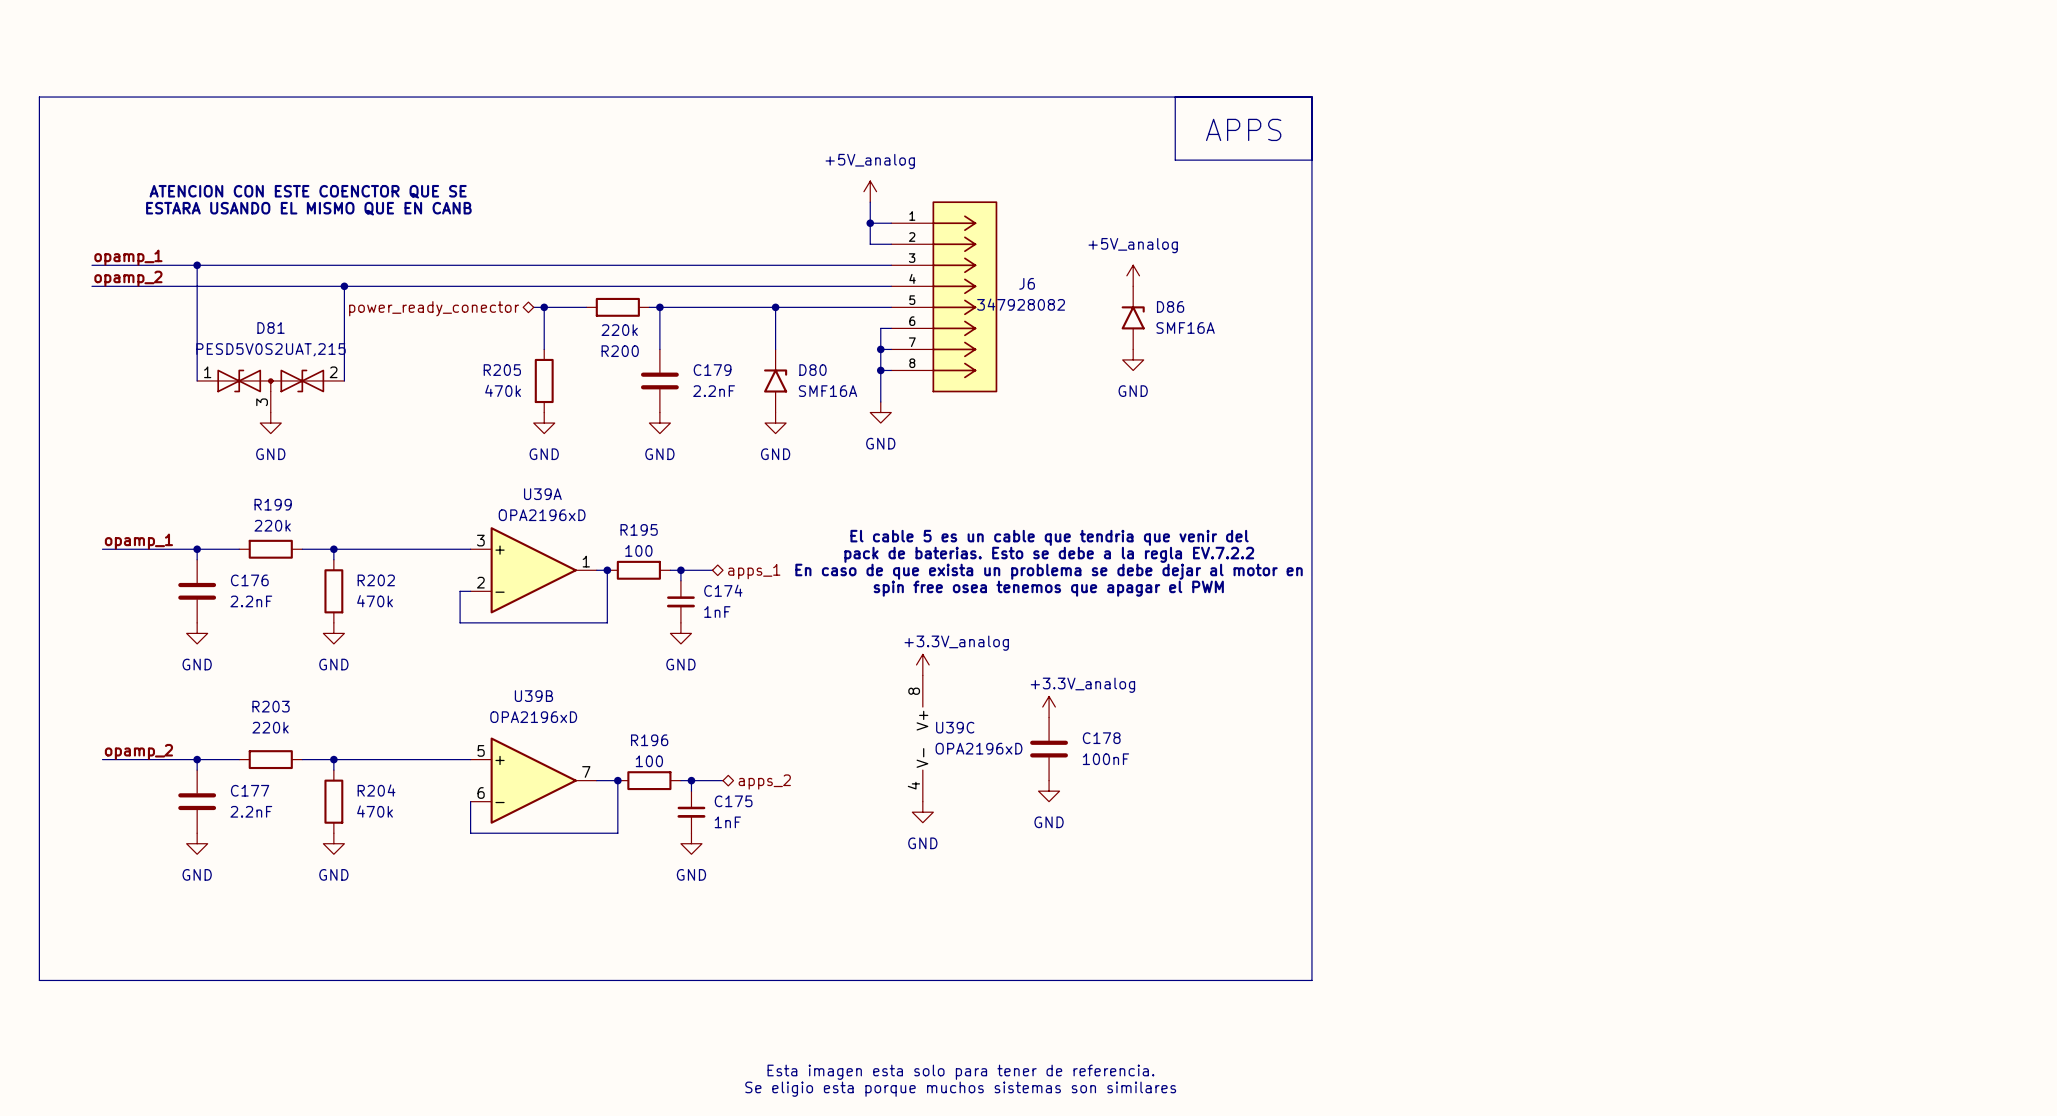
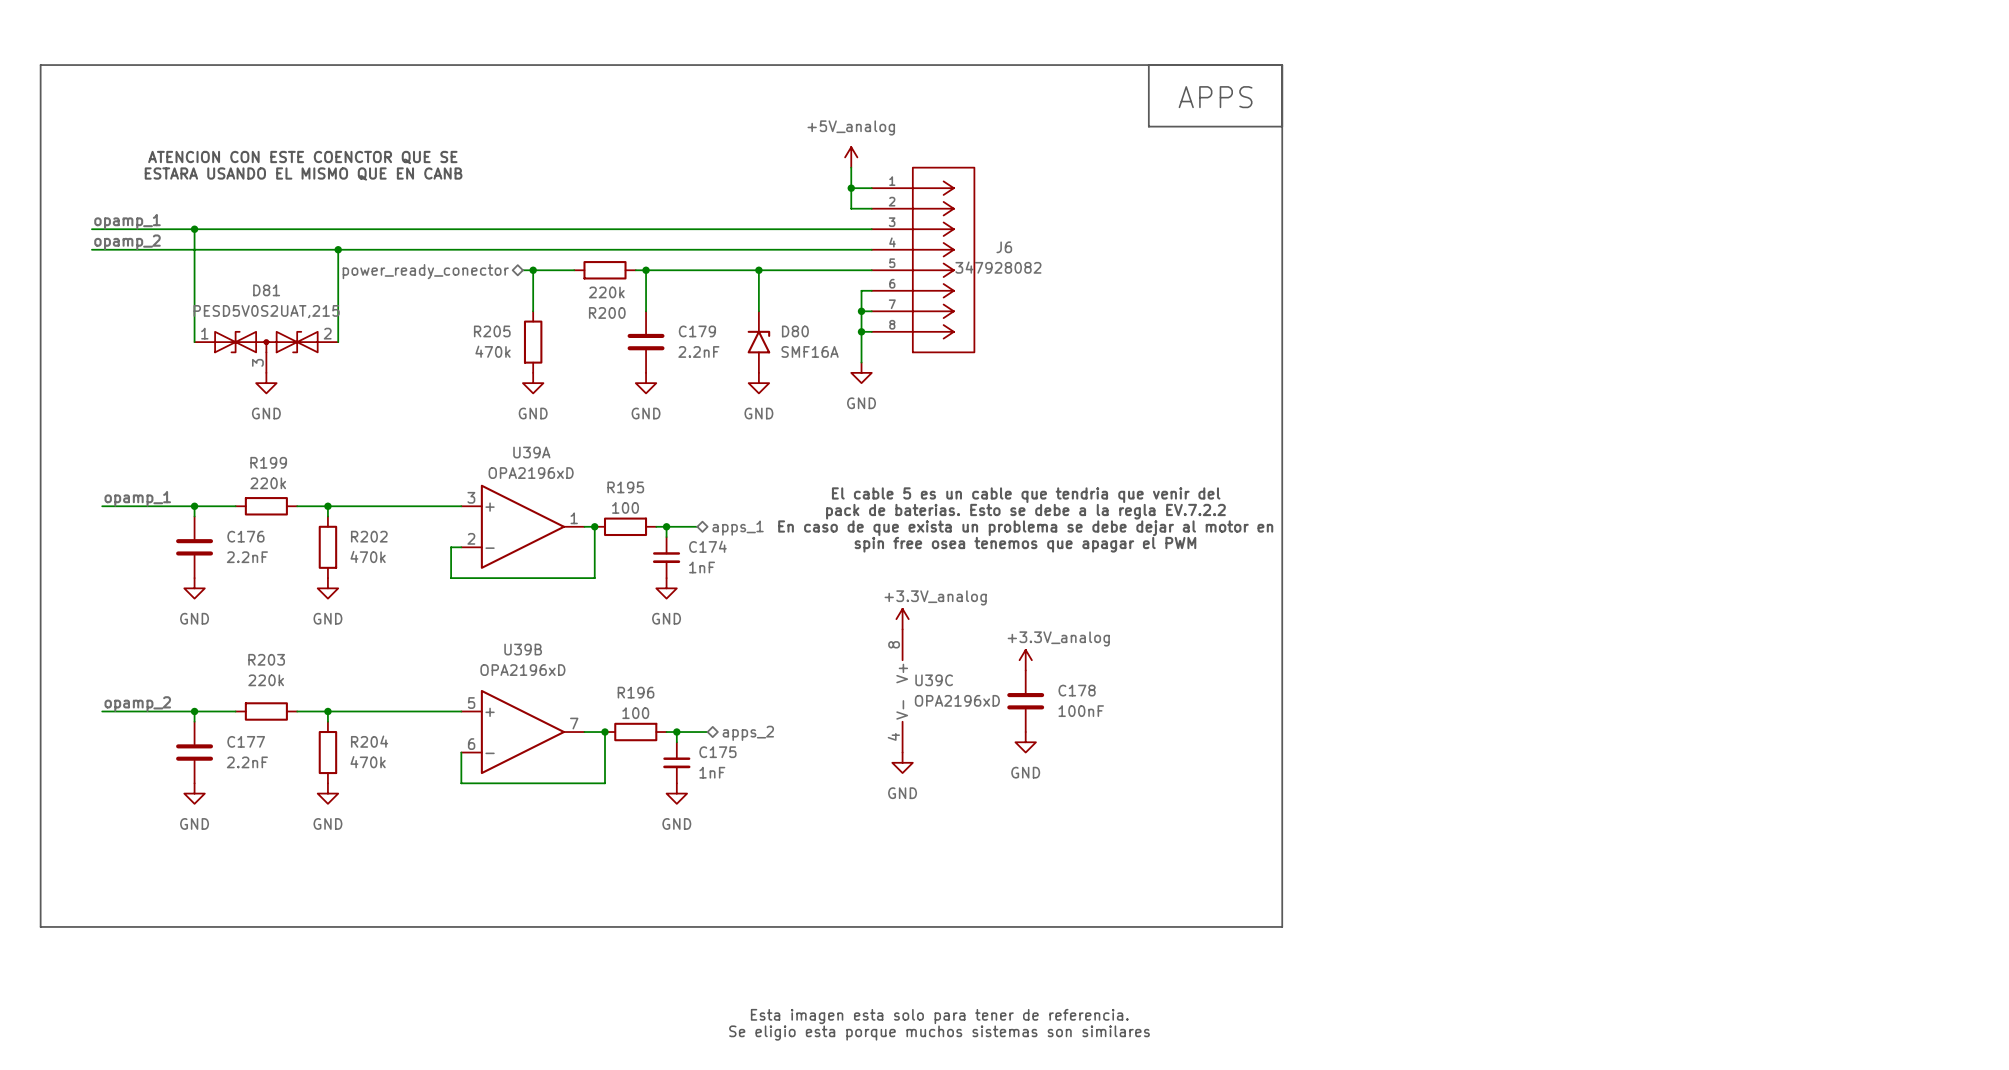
power symbol: +5V_analog (1133, 275) -> none
D86: SMF16A (1133, 317) -> none
power symbol: GND (1133, 359) -> none

